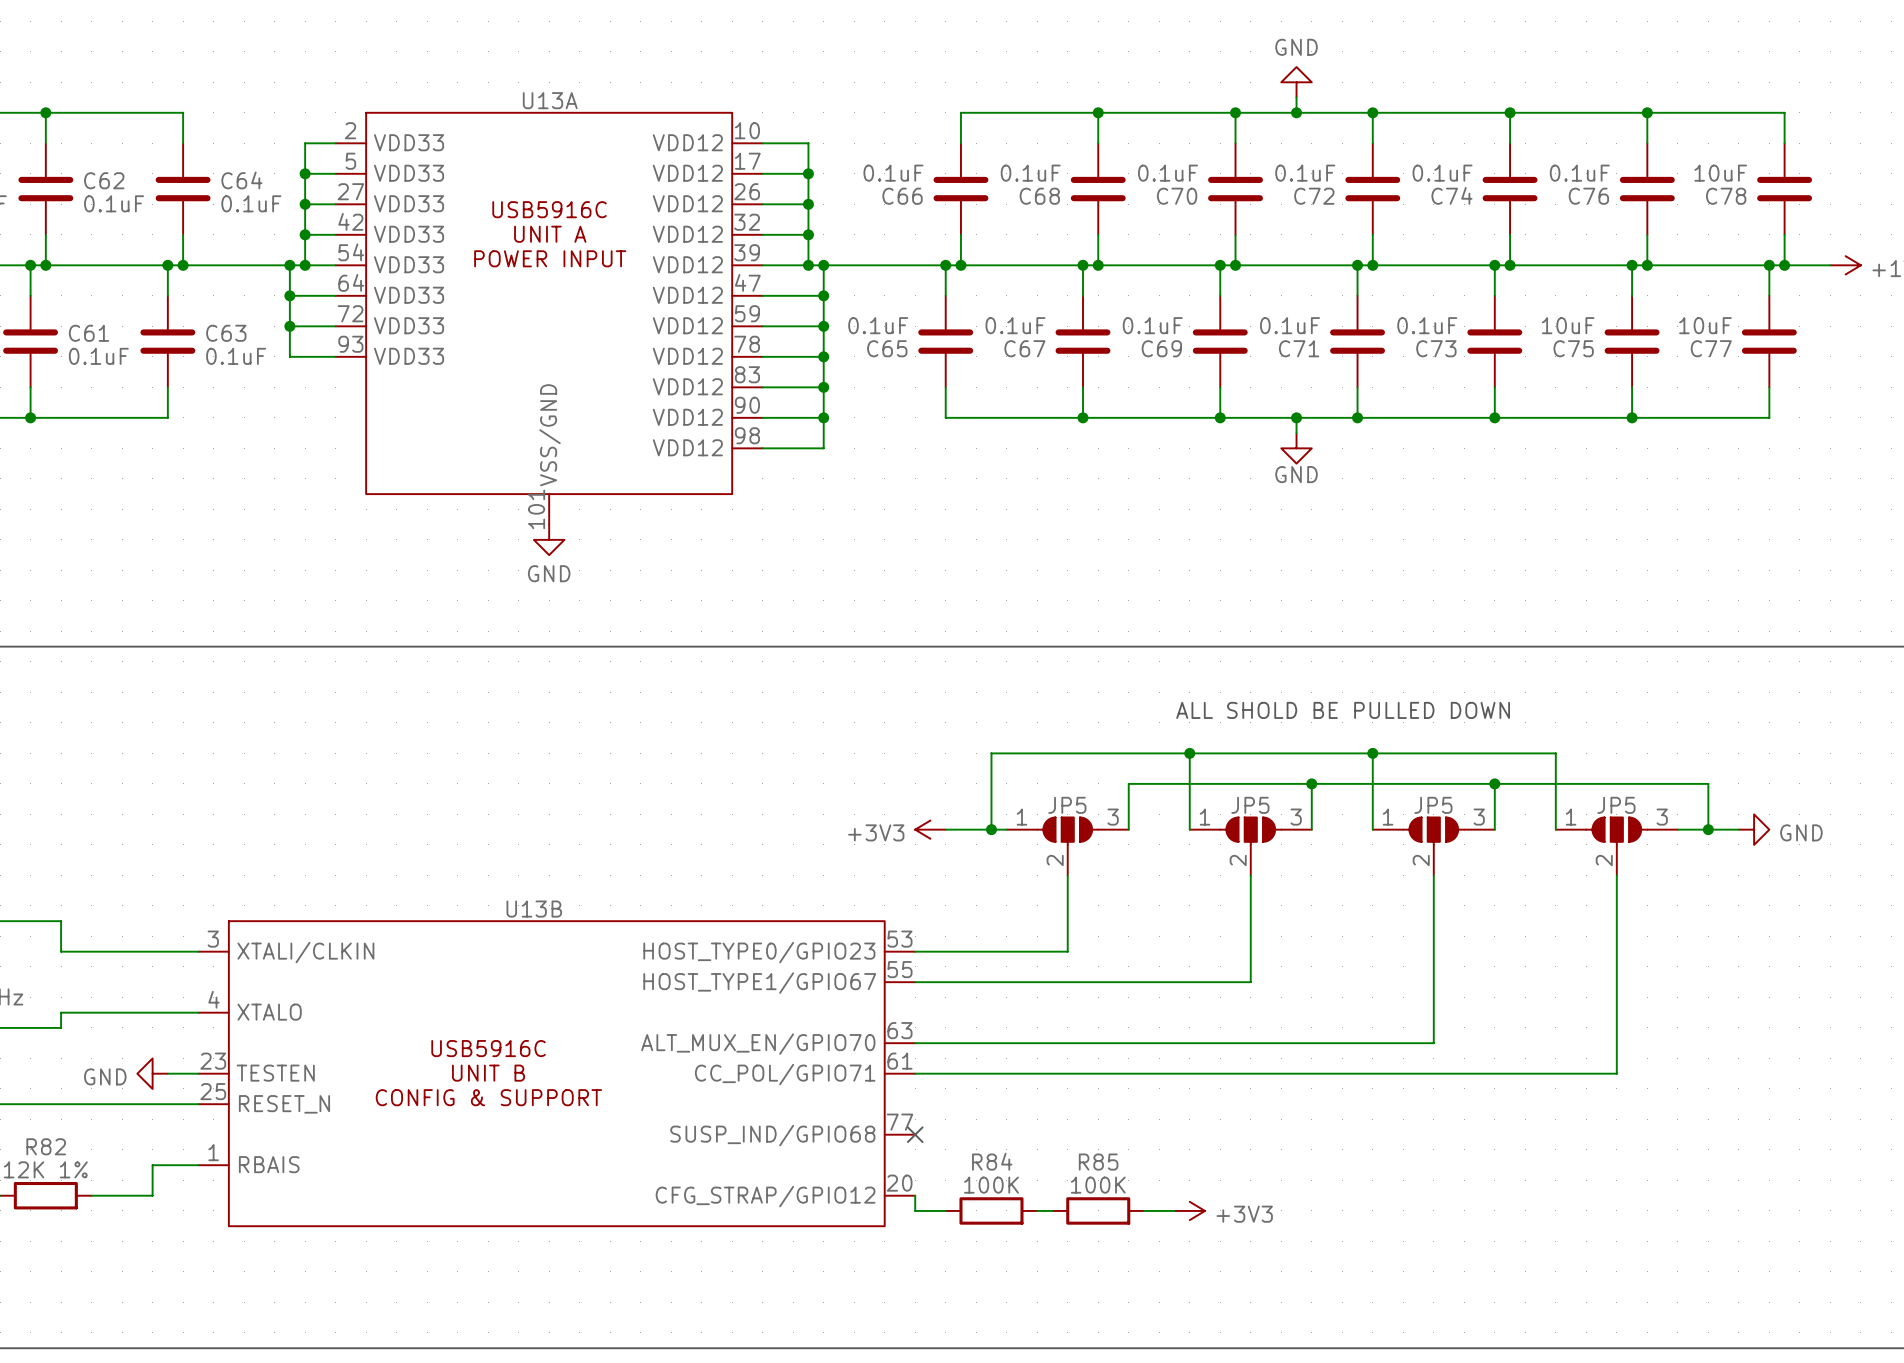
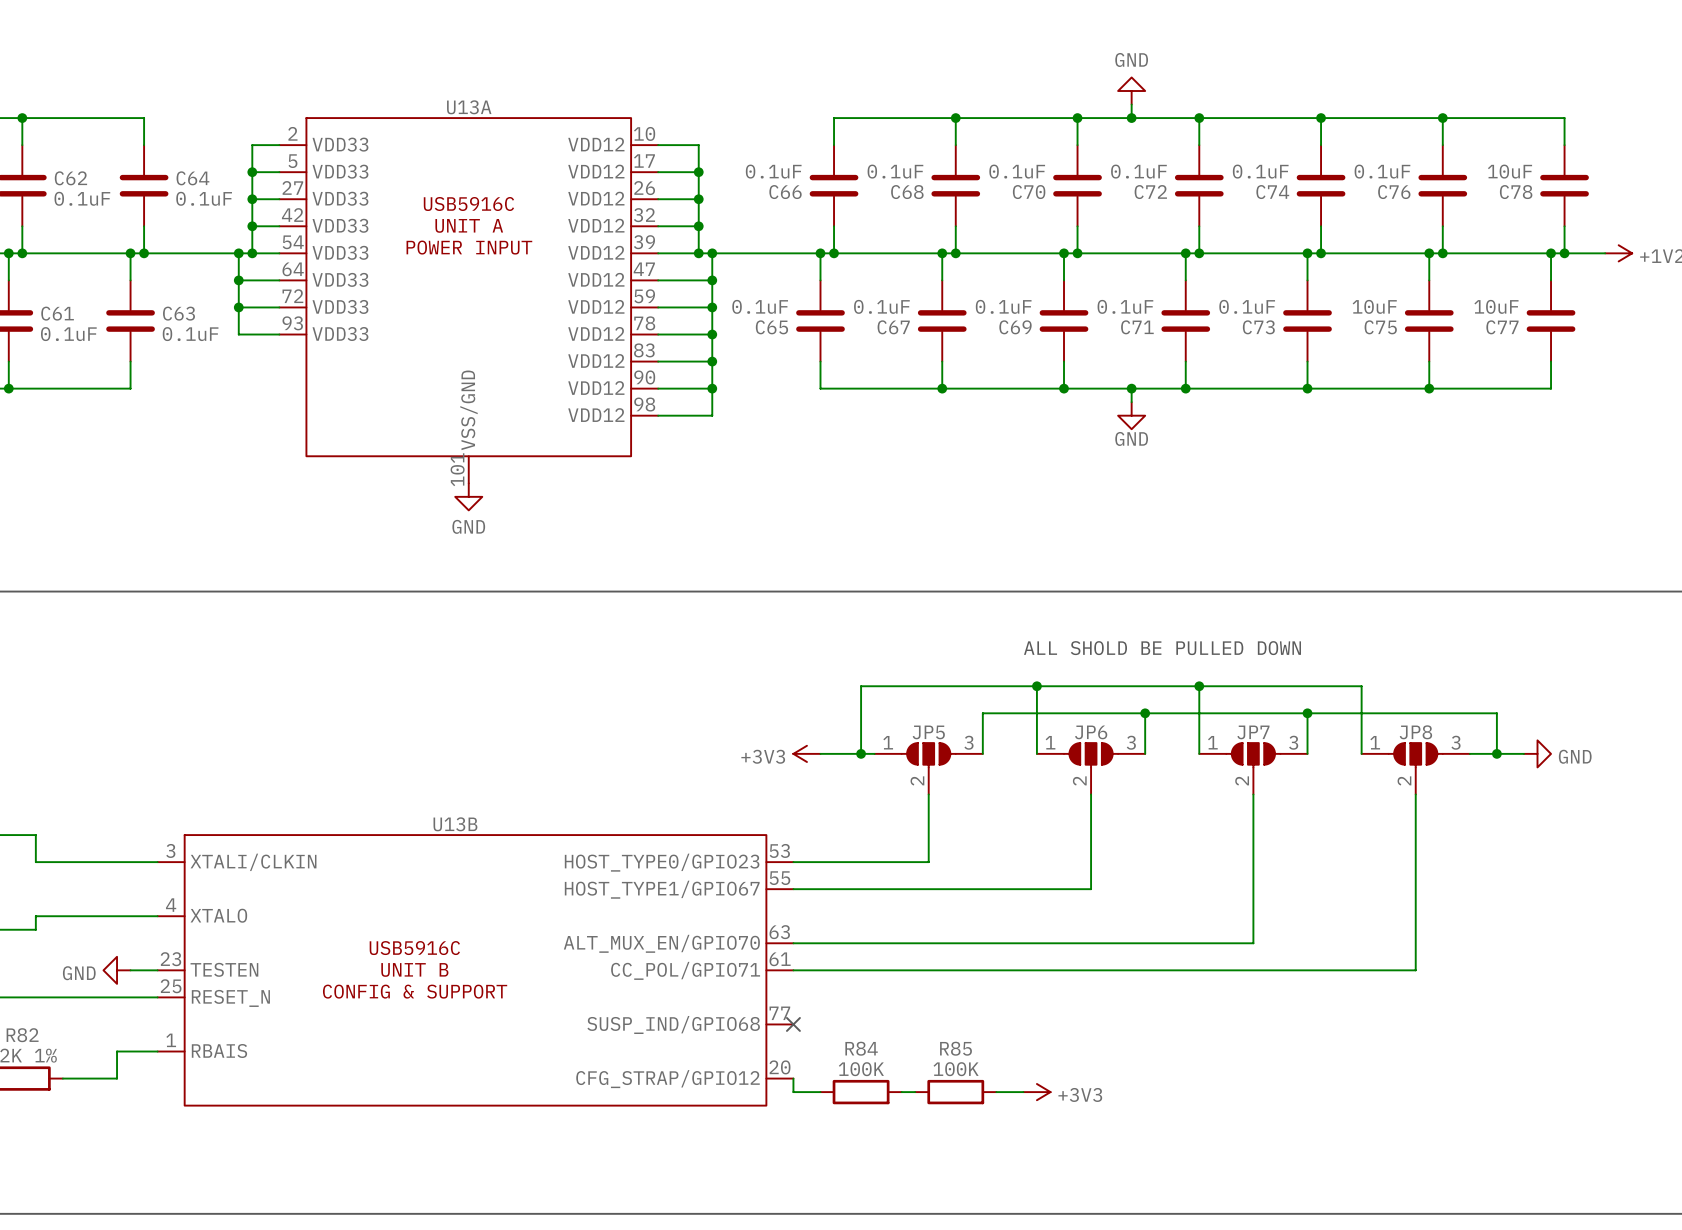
JP5 name: JP5 (1250, 805) -> JP6 (1091, 732)
JP5 name: JP5 (1433, 805) -> JP7 (1253, 732)
JP5 name: JP5 (1616, 805) -> JP8 (1415, 732)

